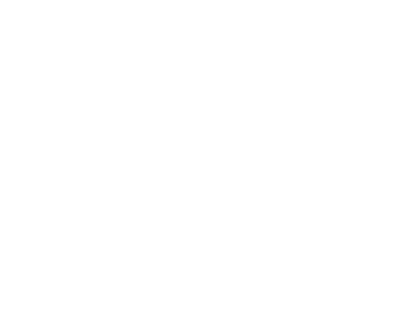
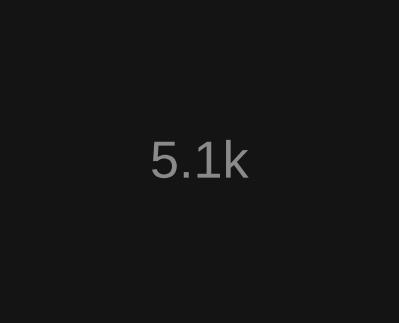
part: none -> 5.1k (200, 159)

